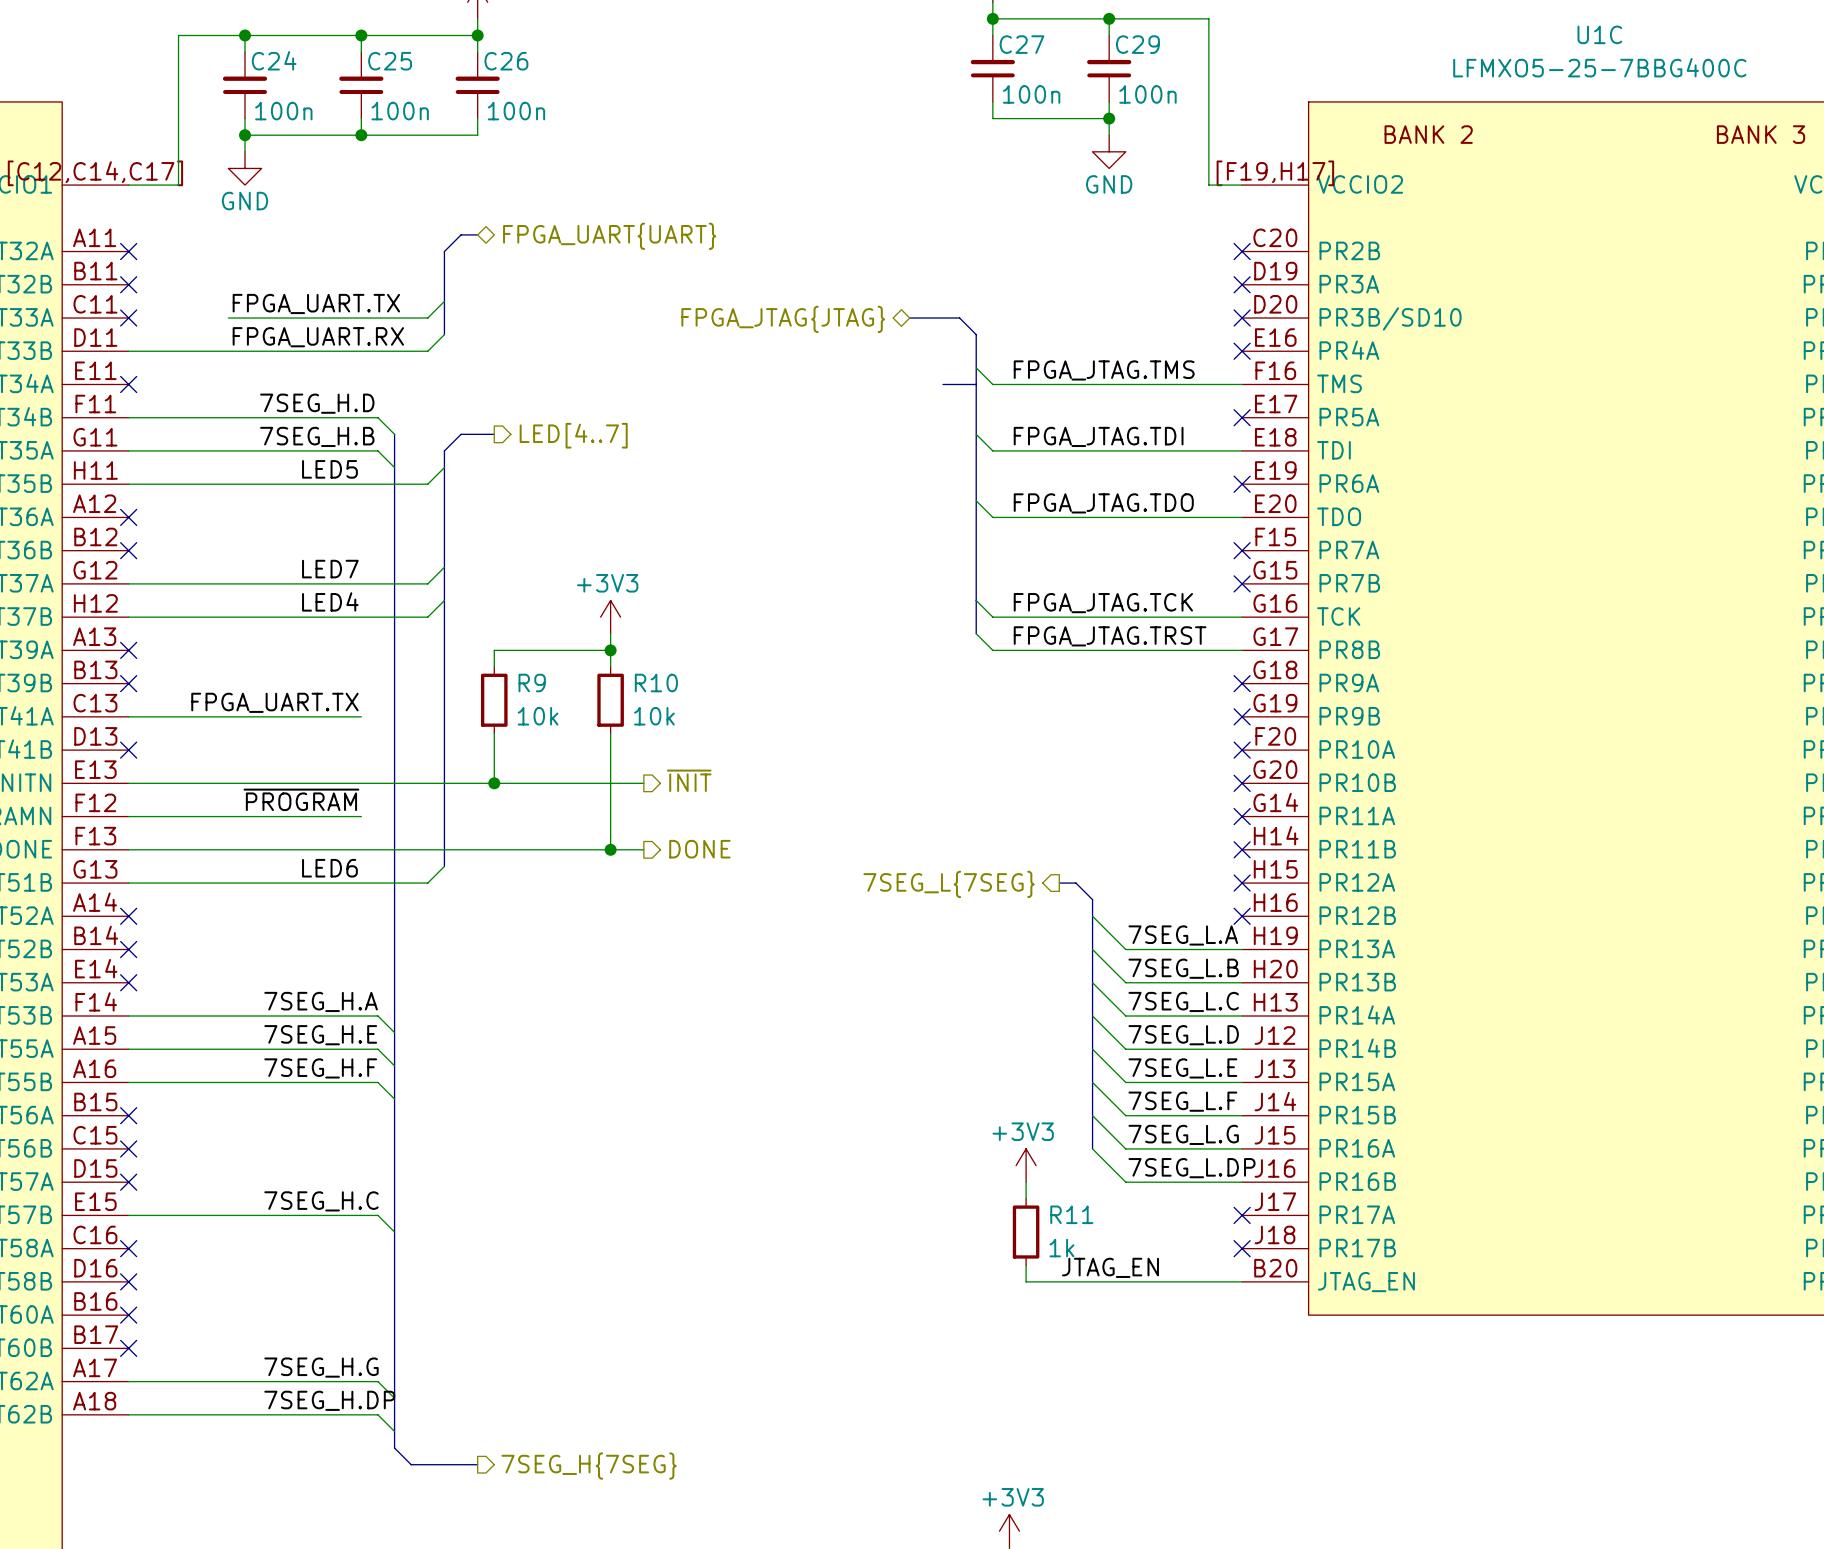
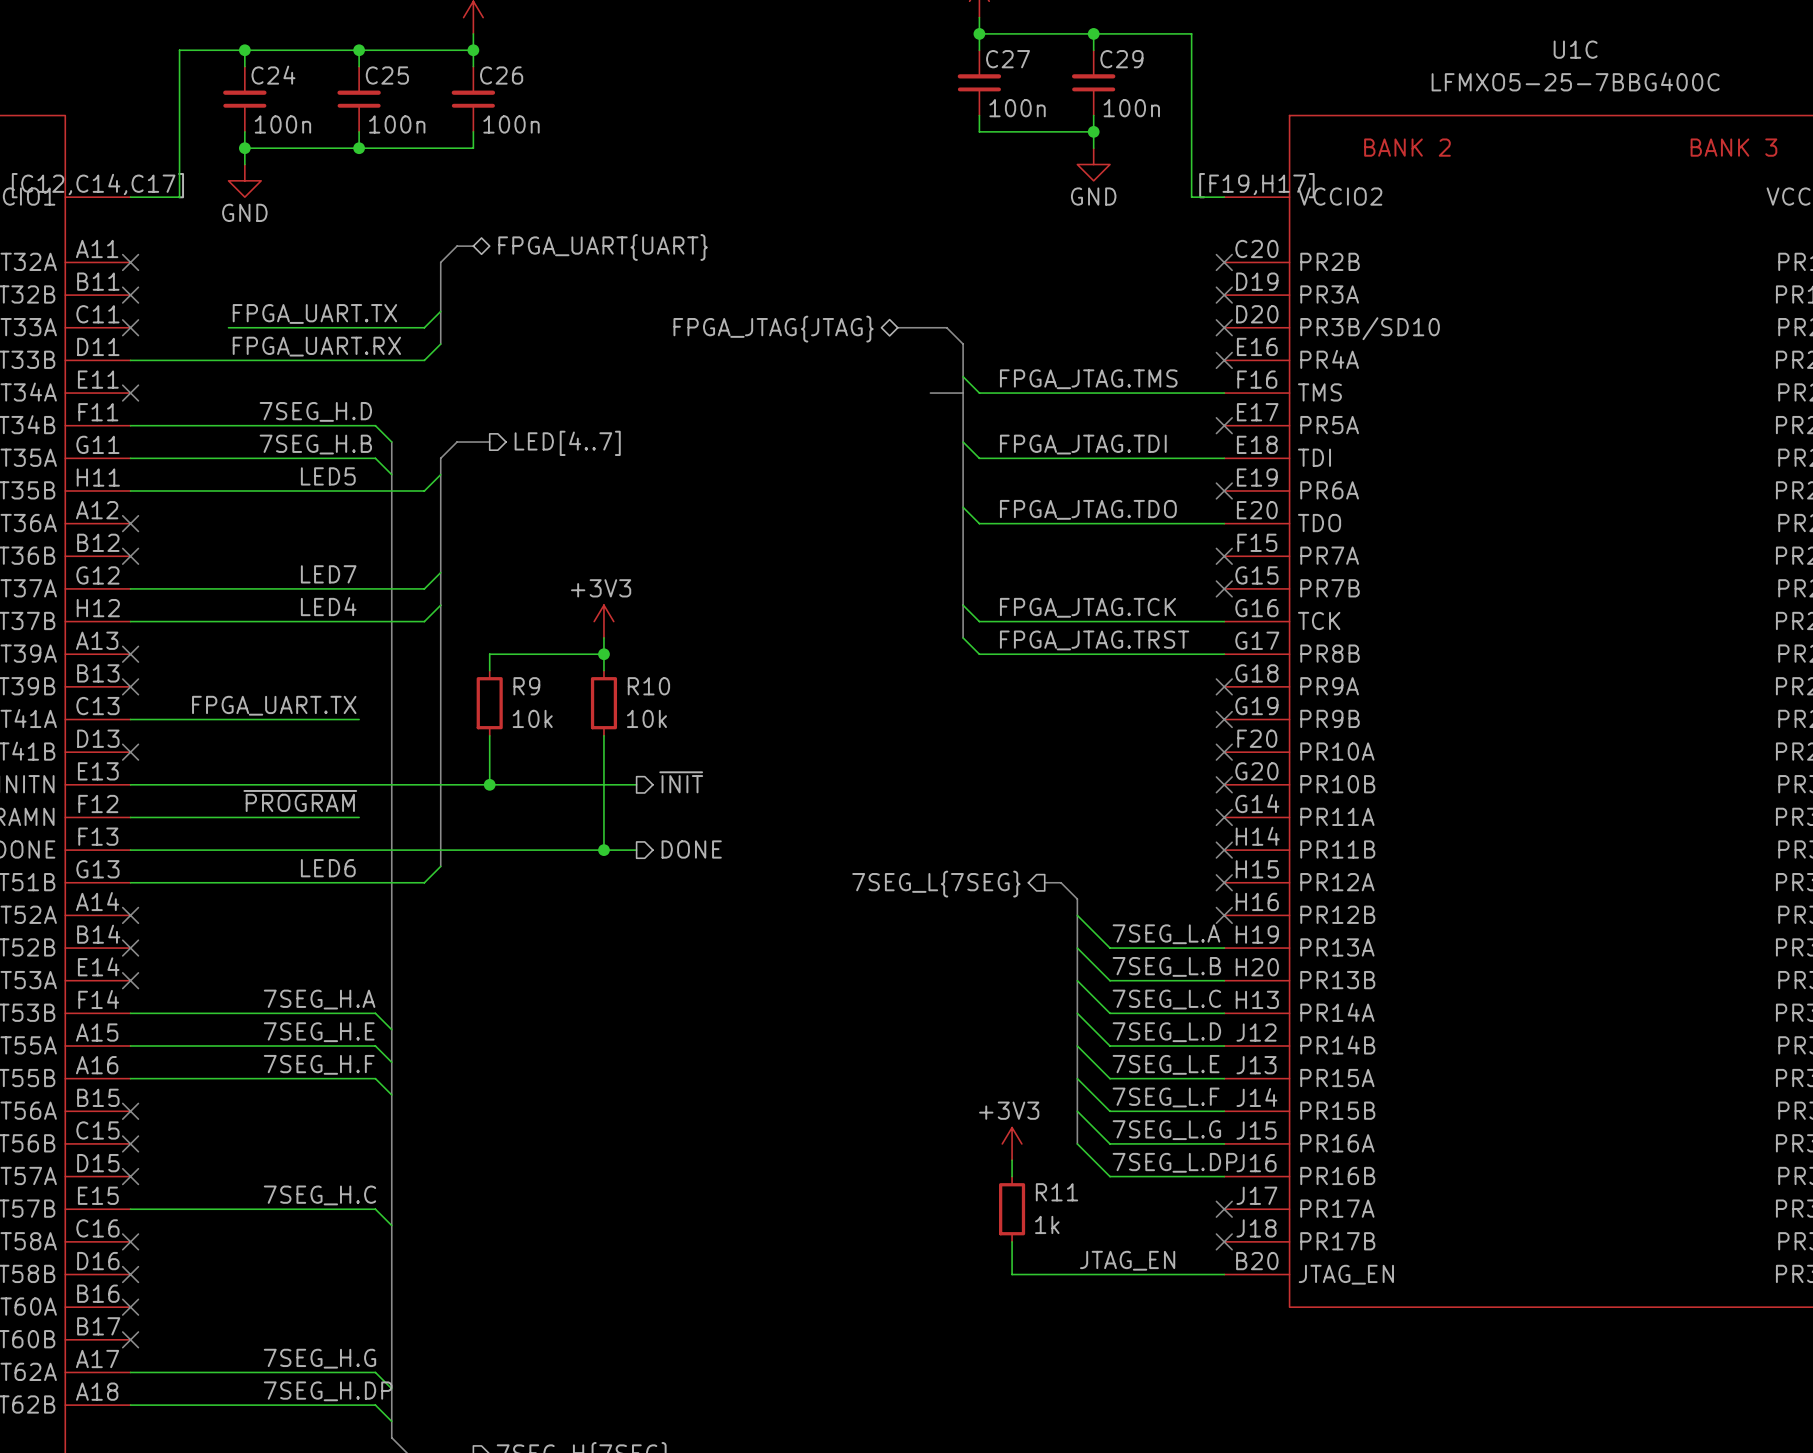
power symbol position: +3V3 (1026, 1165) -> +3V3 (1012, 1143)
R11 position: (1026, 1232) -> (1012, 1209)
label position: JTAG_EN (1110, 1267) -> JTAG_EN (1127, 1260)

